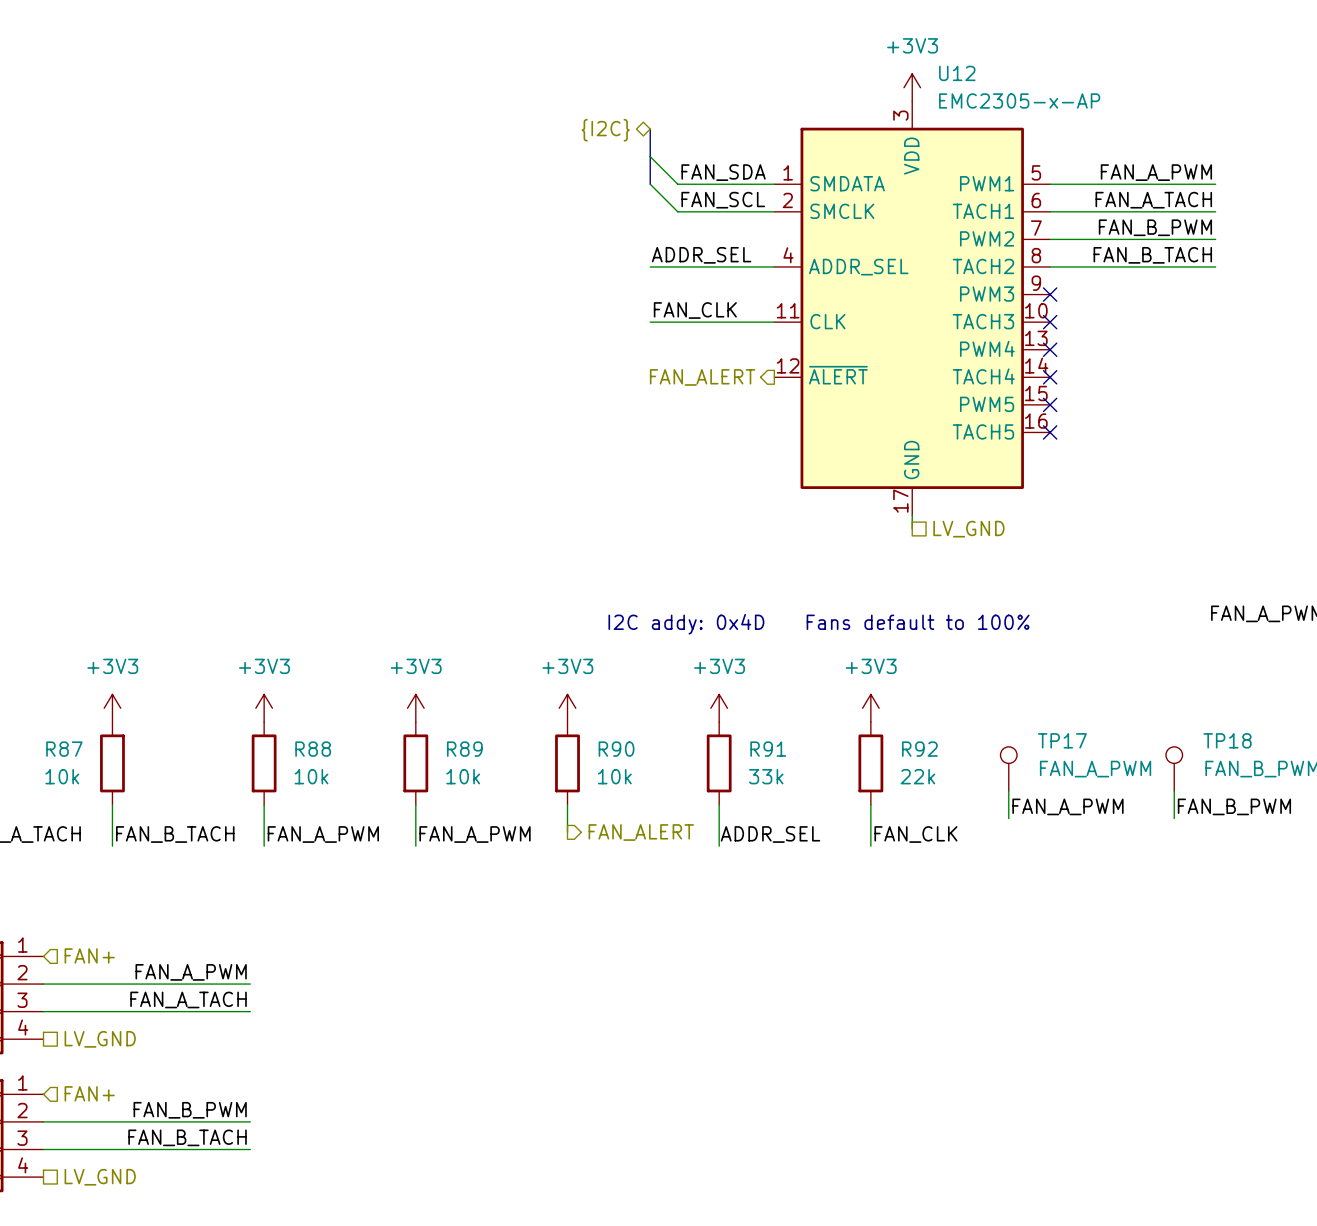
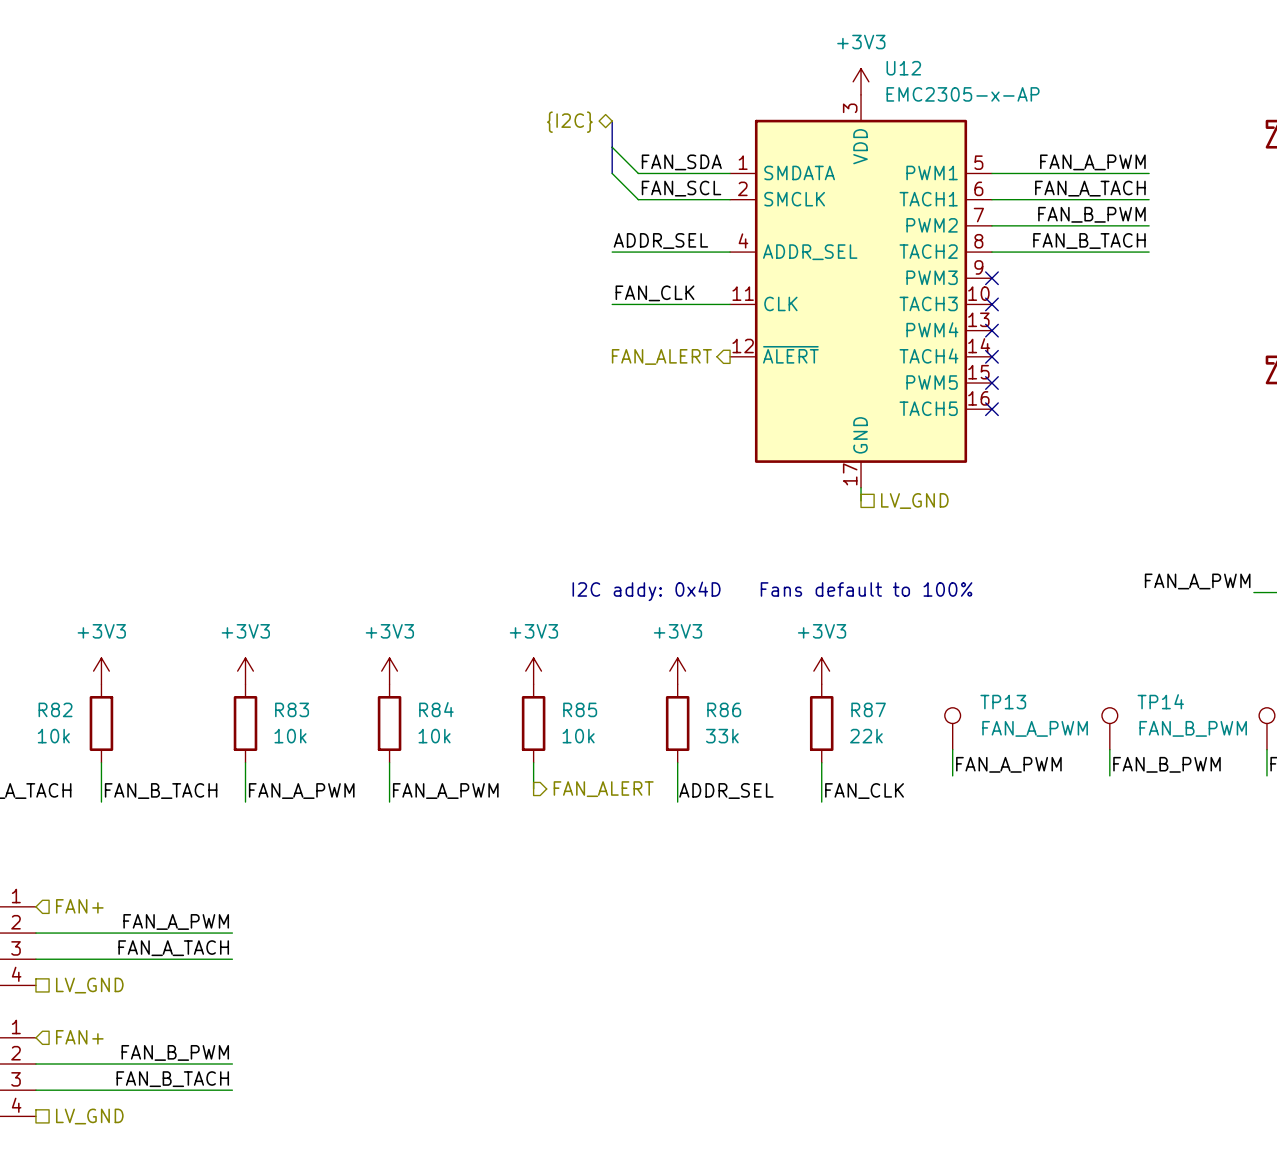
TP17 name: TP17 (1062, 740) -> TP13 (1003, 702)
TP18 name: TP18 (1227, 740) -> TP14 (1160, 701)
R87 name: R87 (64, 749) -> R82 (55, 709)
R88 name: R88 (313, 749) -> R83 (292, 709)
R89 name: R89 (464, 749) -> R84 (436, 709)
R90 name: R90 (616, 749) -> R85 (580, 709)
R91 name: R91 (768, 749) -> R86 (724, 709)
R92 name: R92 (919, 749) -> R87 (868, 709)

